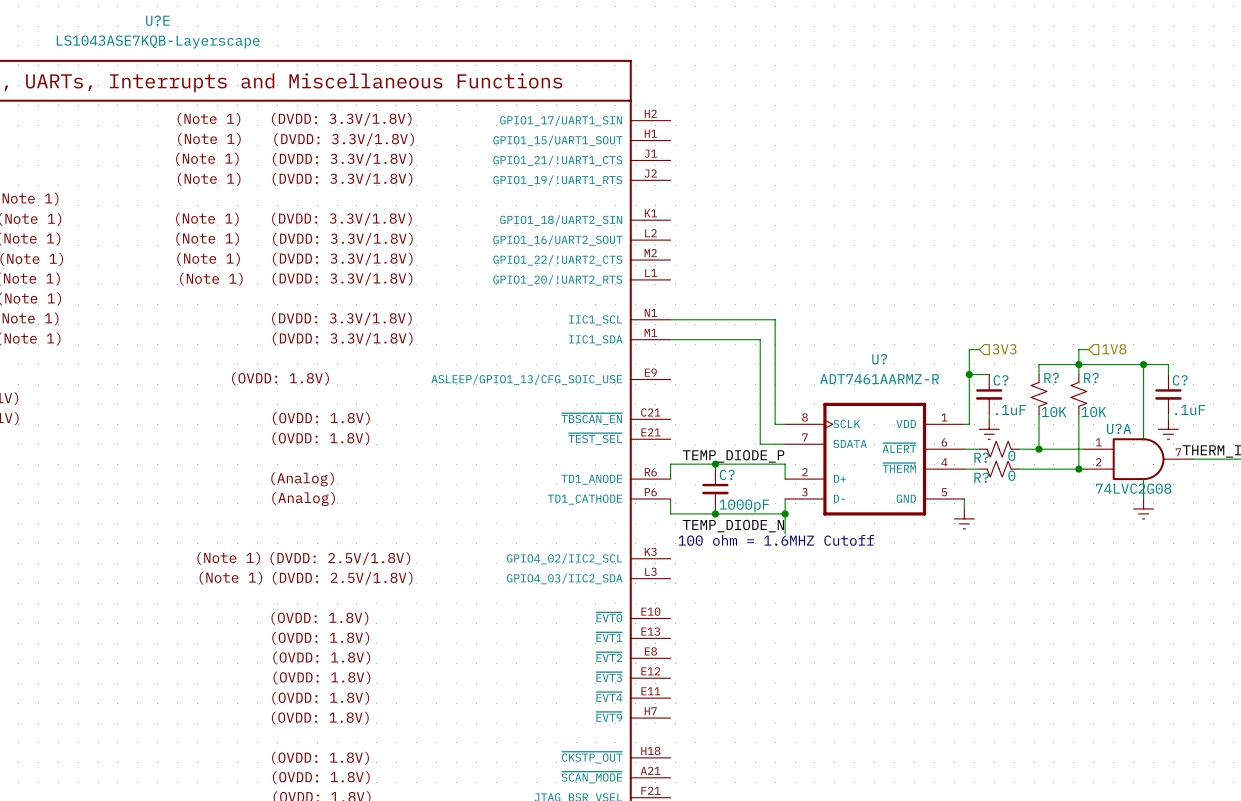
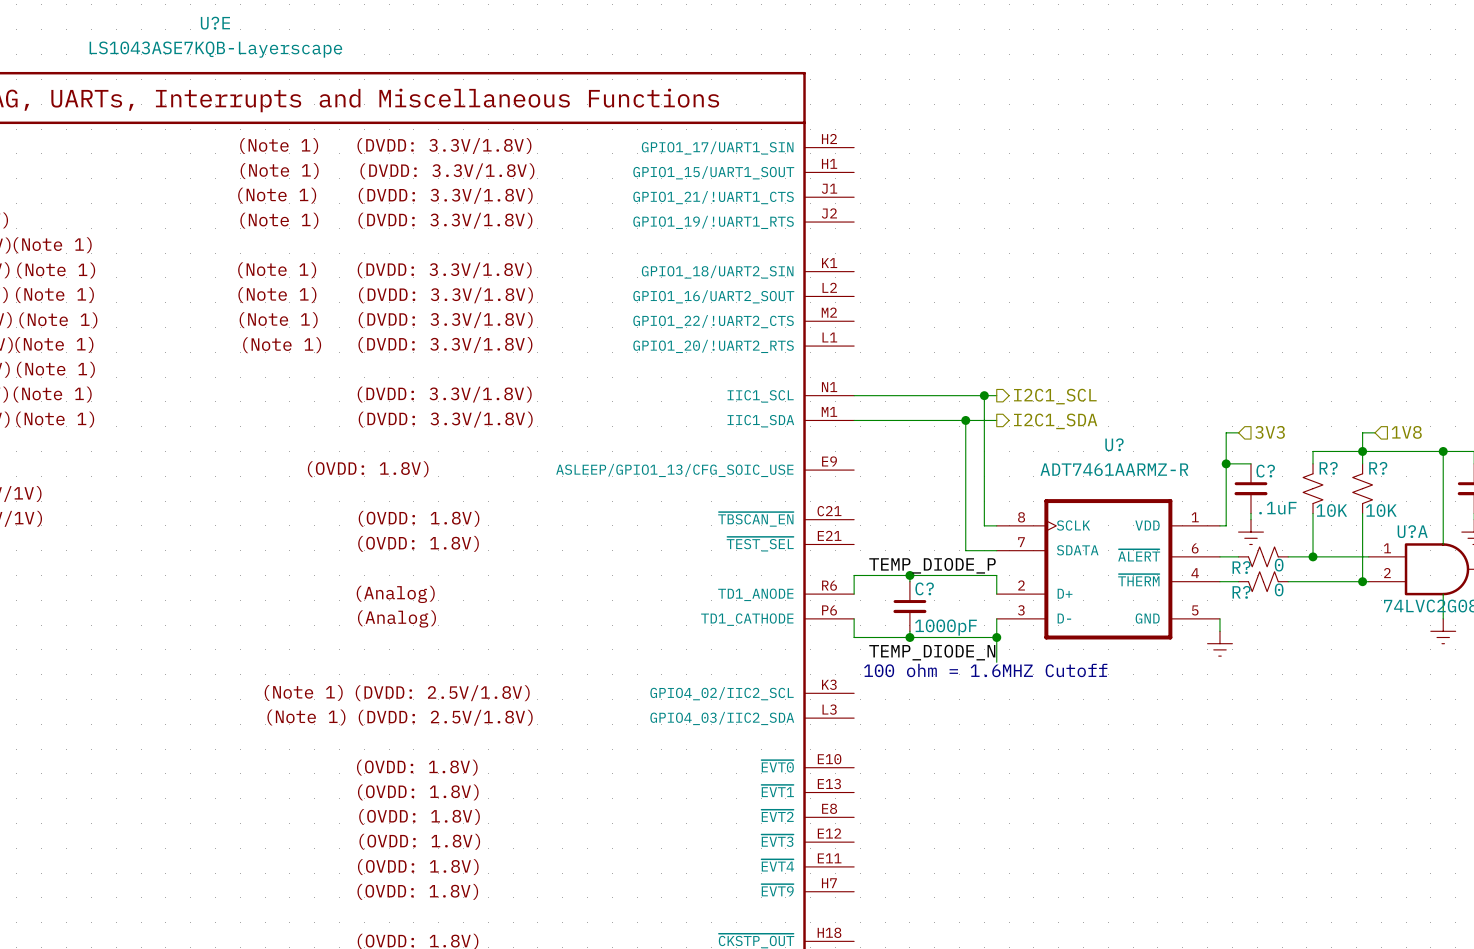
wire: none -> (984, 395) (996, 395)
junction: none -> (984, 395)
hierarchical label: none -> I2C1_SCL (1055, 396)
wire: none -> (965, 420) (996, 420)
junction: none -> (965, 420)
hierarchical label: none -> I2C1_SDA (1055, 421)

